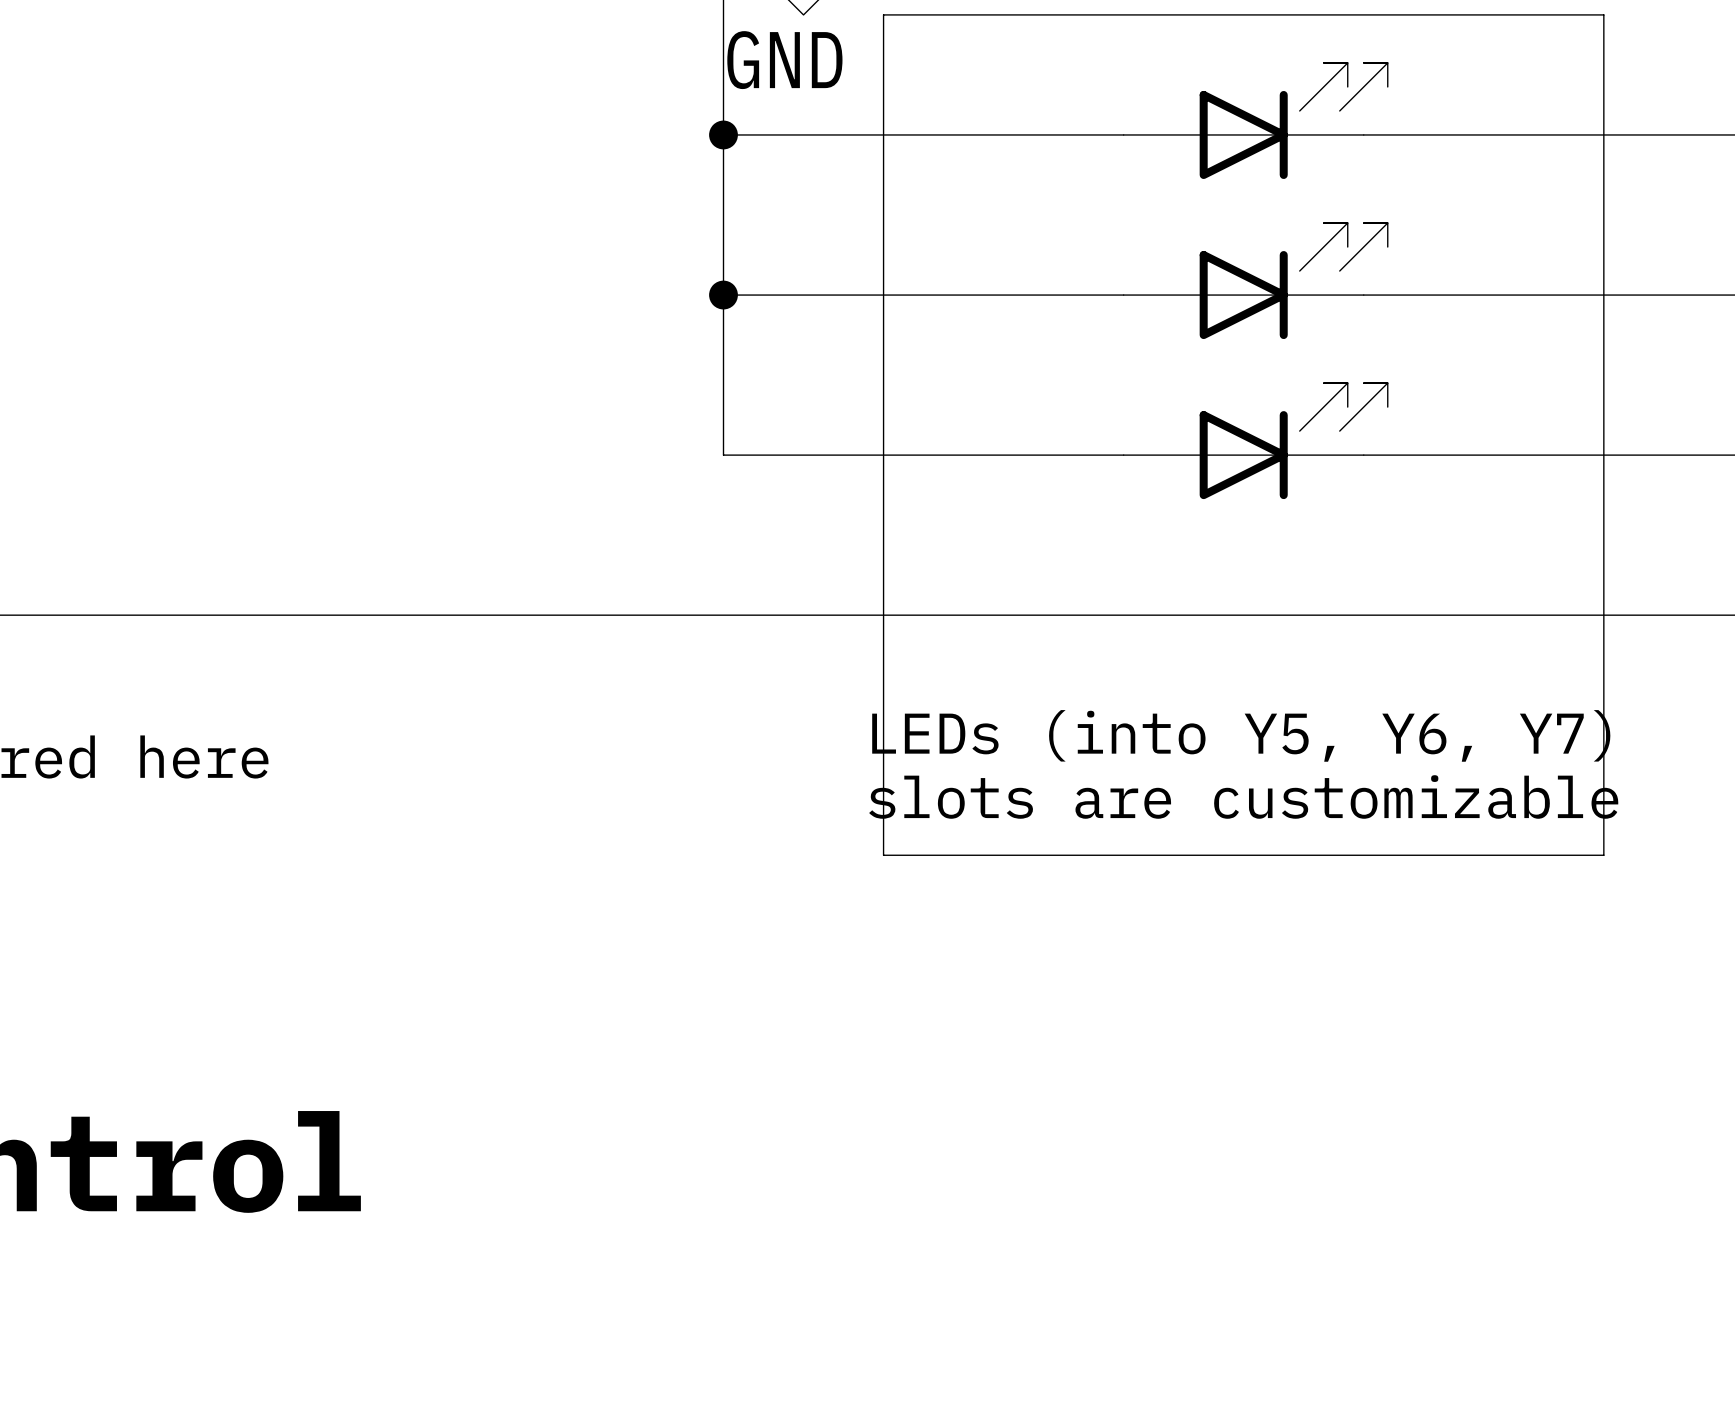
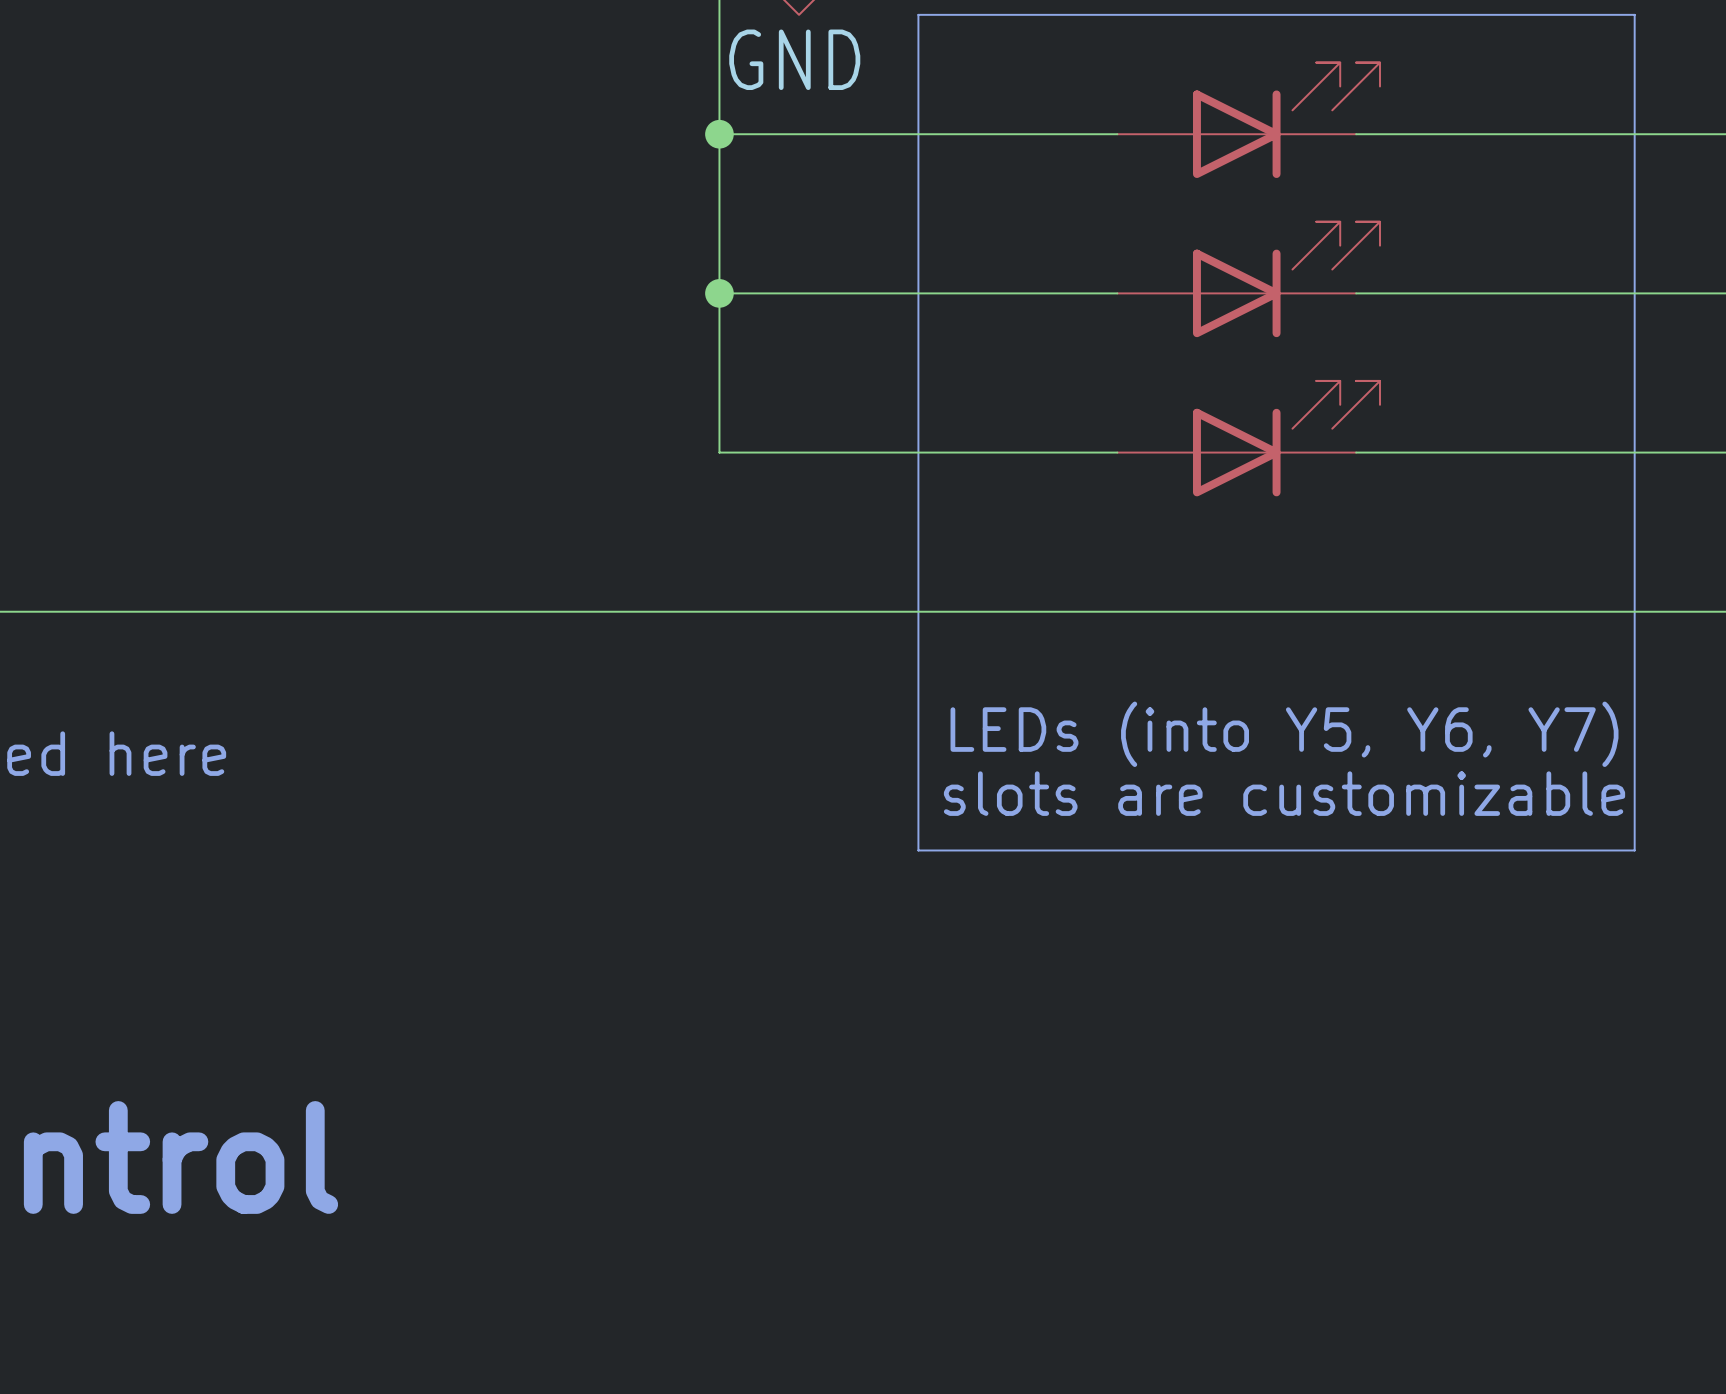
line: (923, 14) (883, 14) (883, 855) (923, 855) -> (918, 14) (918, 850)
line: (1603, 14) (1603, 855) -> (1594, 14) (1634, 14) (1634, 850) (1594, 850)
text position: LEDs (into Y5, Y6, Y7) (1241, 735) -> LEDs (into Y5, Y6, Y7) (1284, 734)
text position: slots are customizable (1243, 796) -> slots are customizable (1284, 793)

